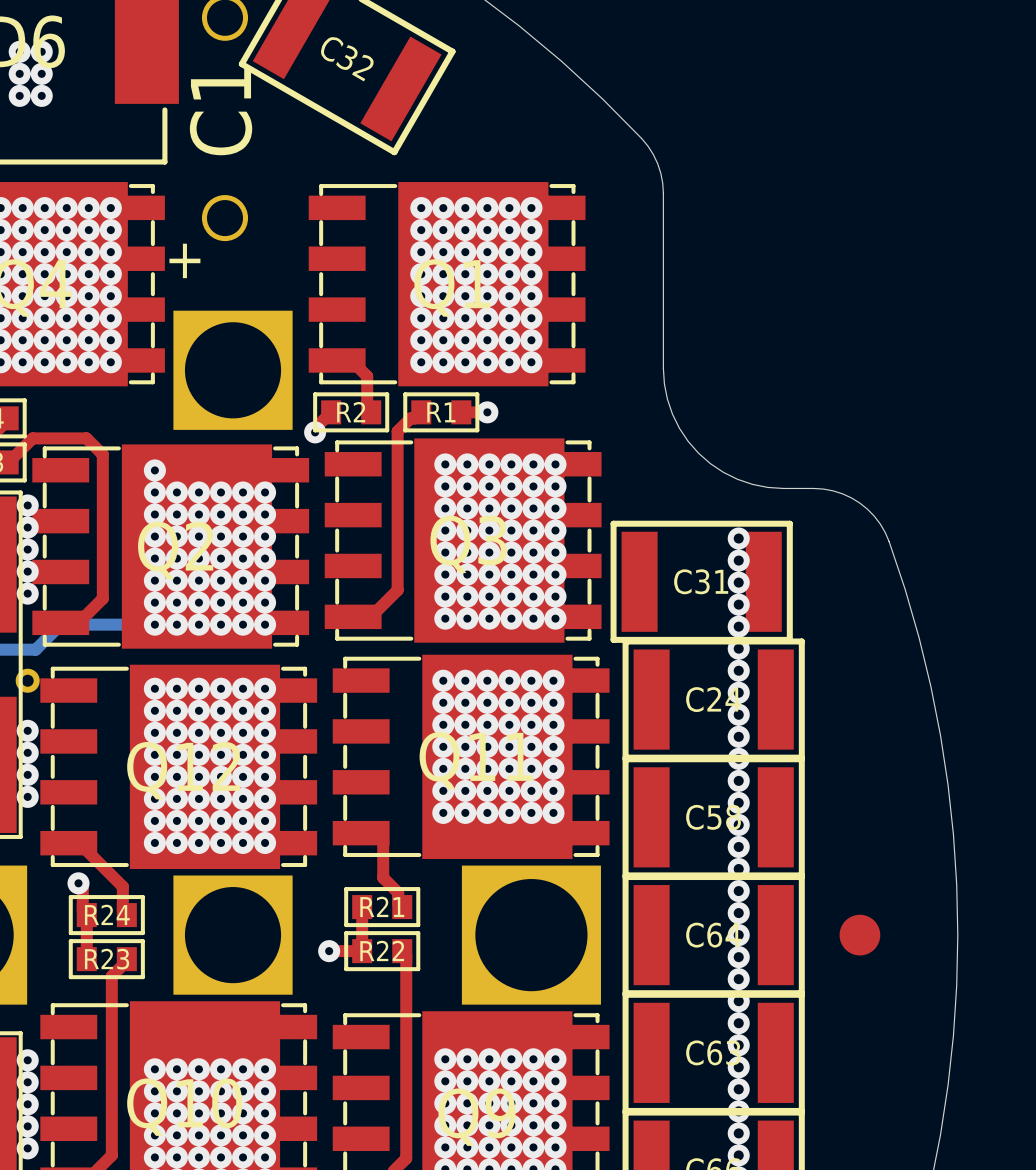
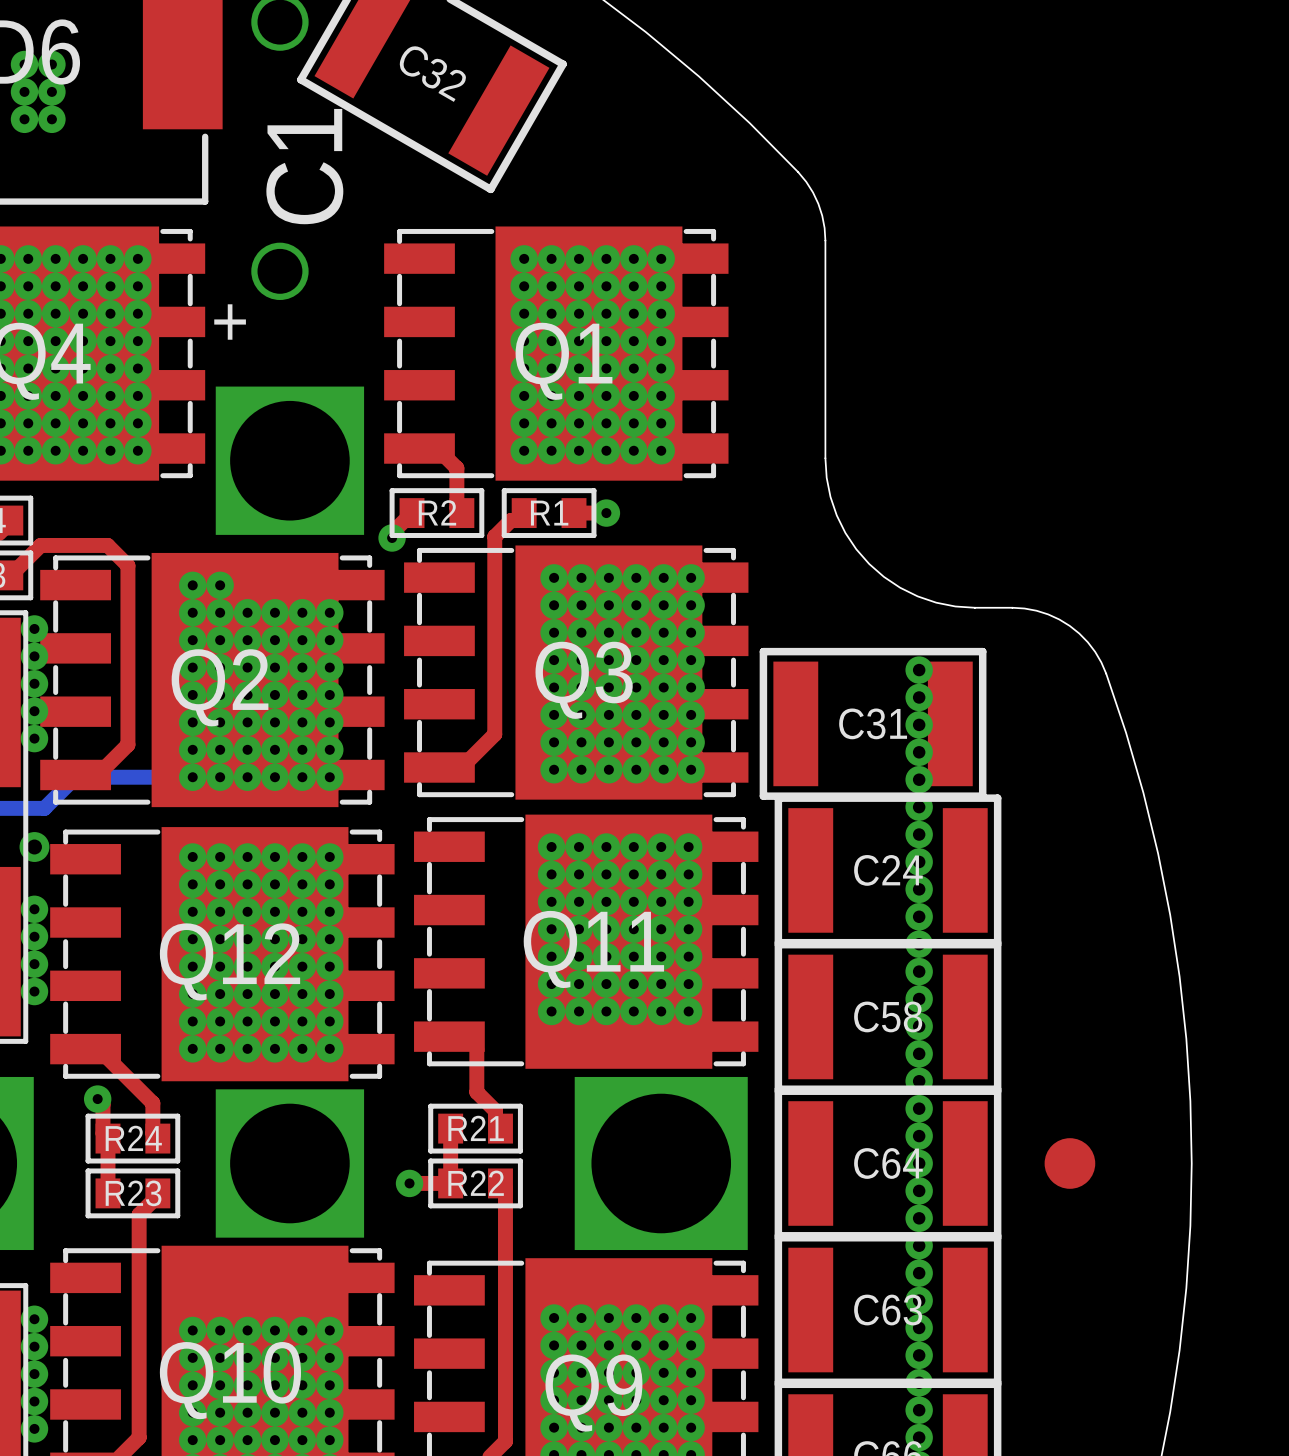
C1 name position: C1 (221, 111) -> C1 (304, 166)
via: none -> (220, 585)

